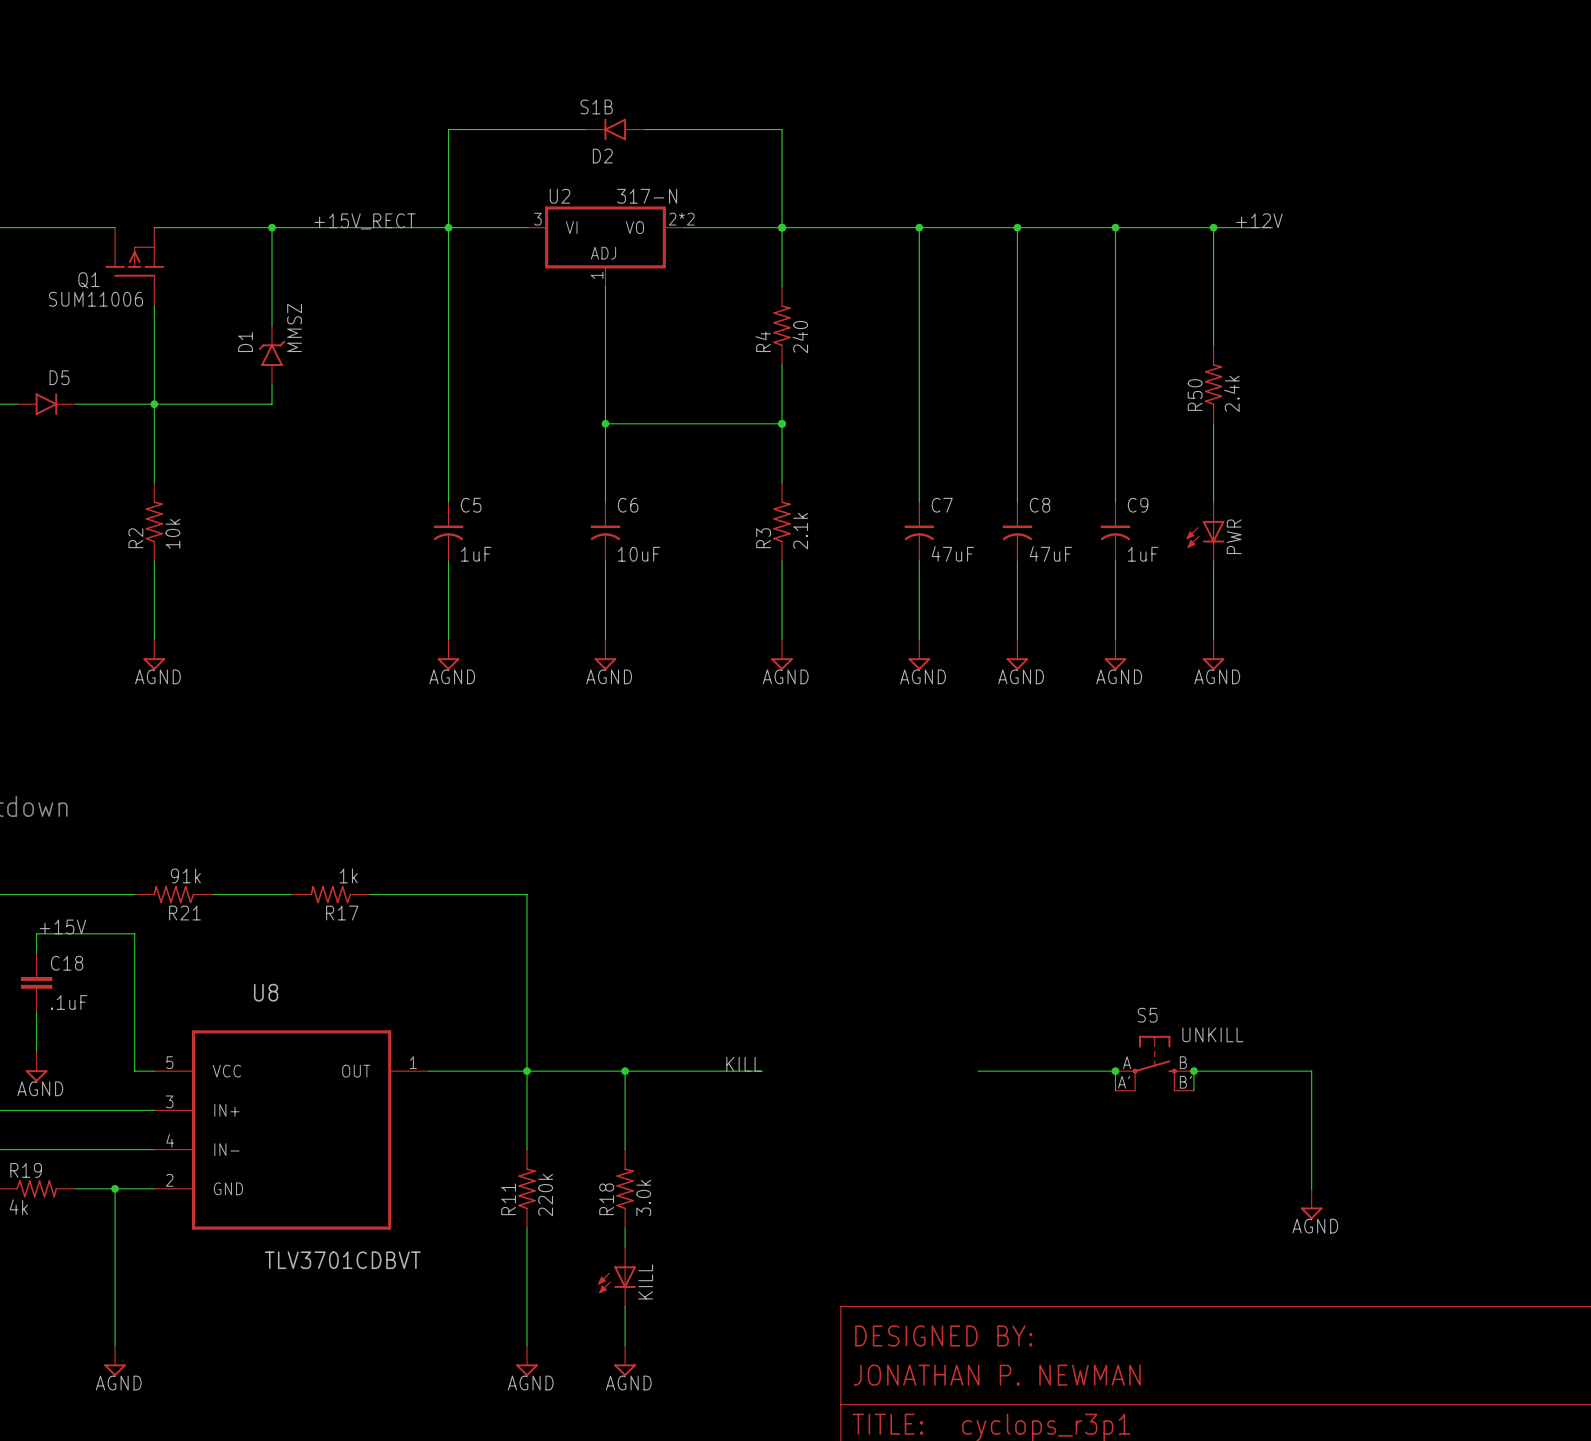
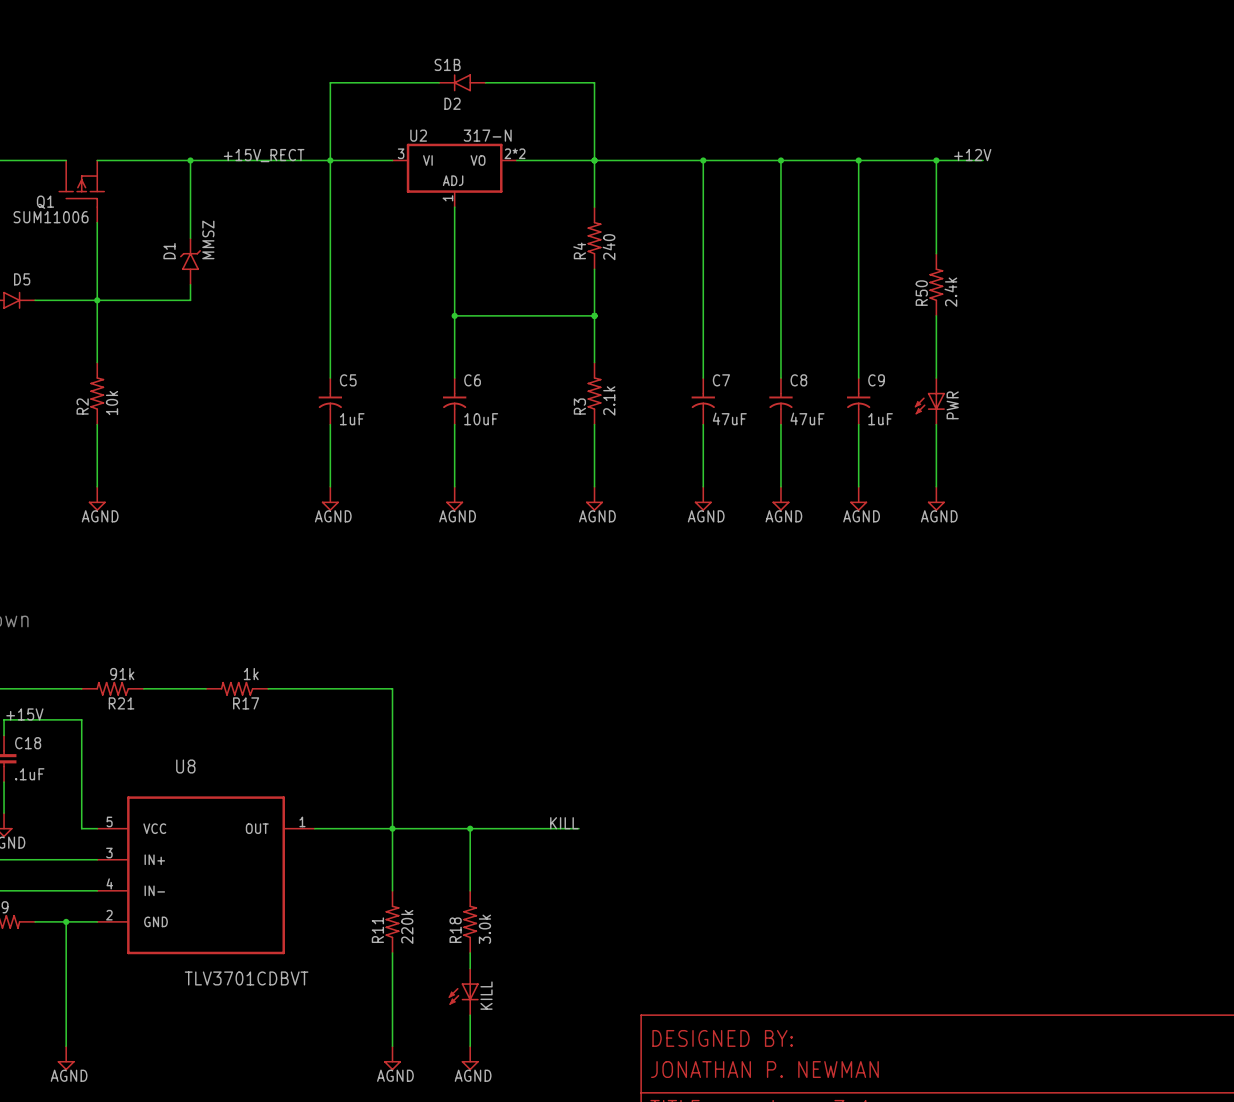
S5: UNKILL (1154, 1063) -> none
wire: (978, 1071) (1115, 1071) (1115, 1090) -> none
junction: (1115, 1071) -> none
junction: (1193, 1071) -> none
wire: (1193, 1090) (1193, 1071) (1311, 1071) (1311, 1188) -> none
power symbol: AGND (1311, 1204) -> none

